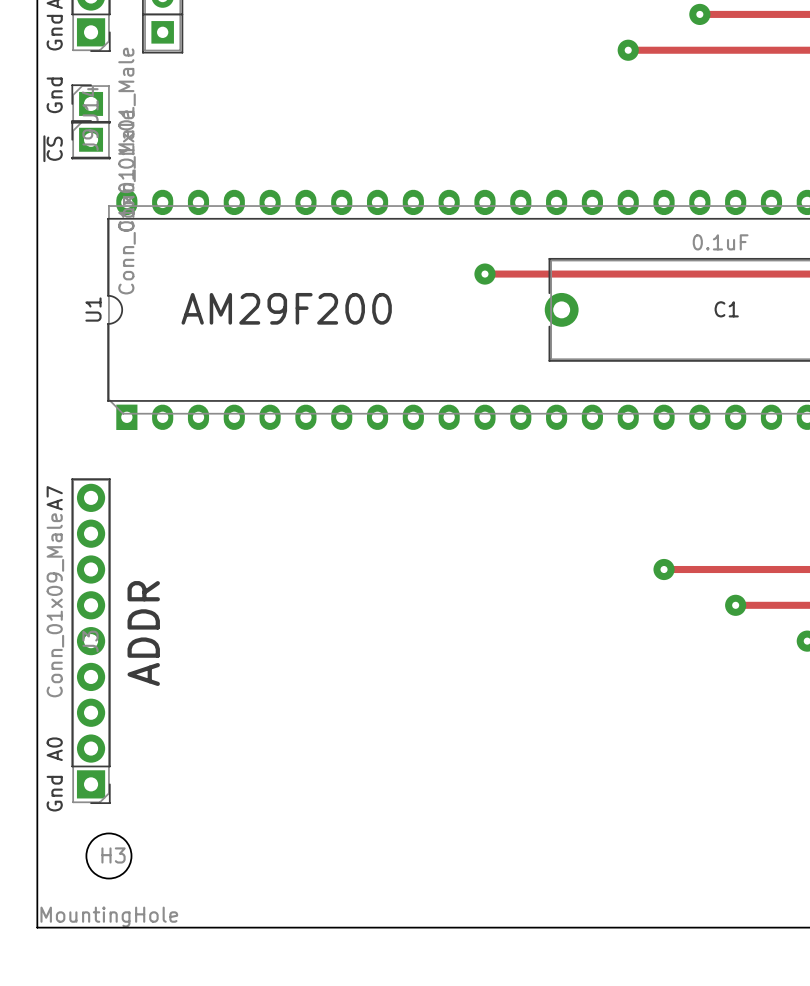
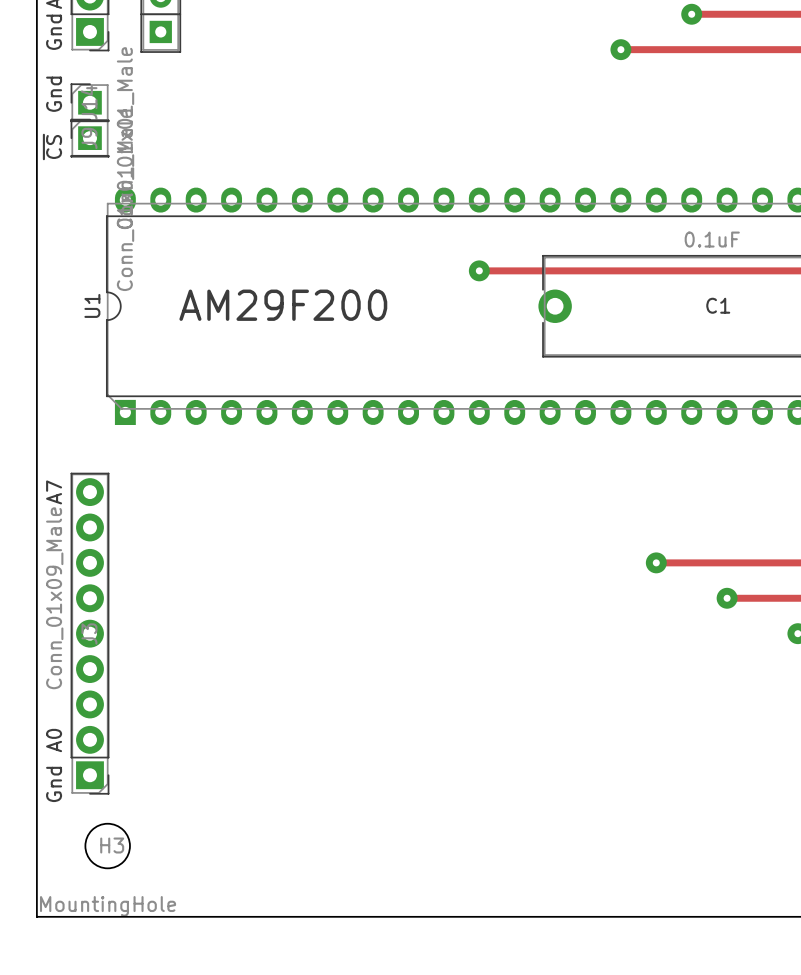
text: ADDR (143, 633) -> none

